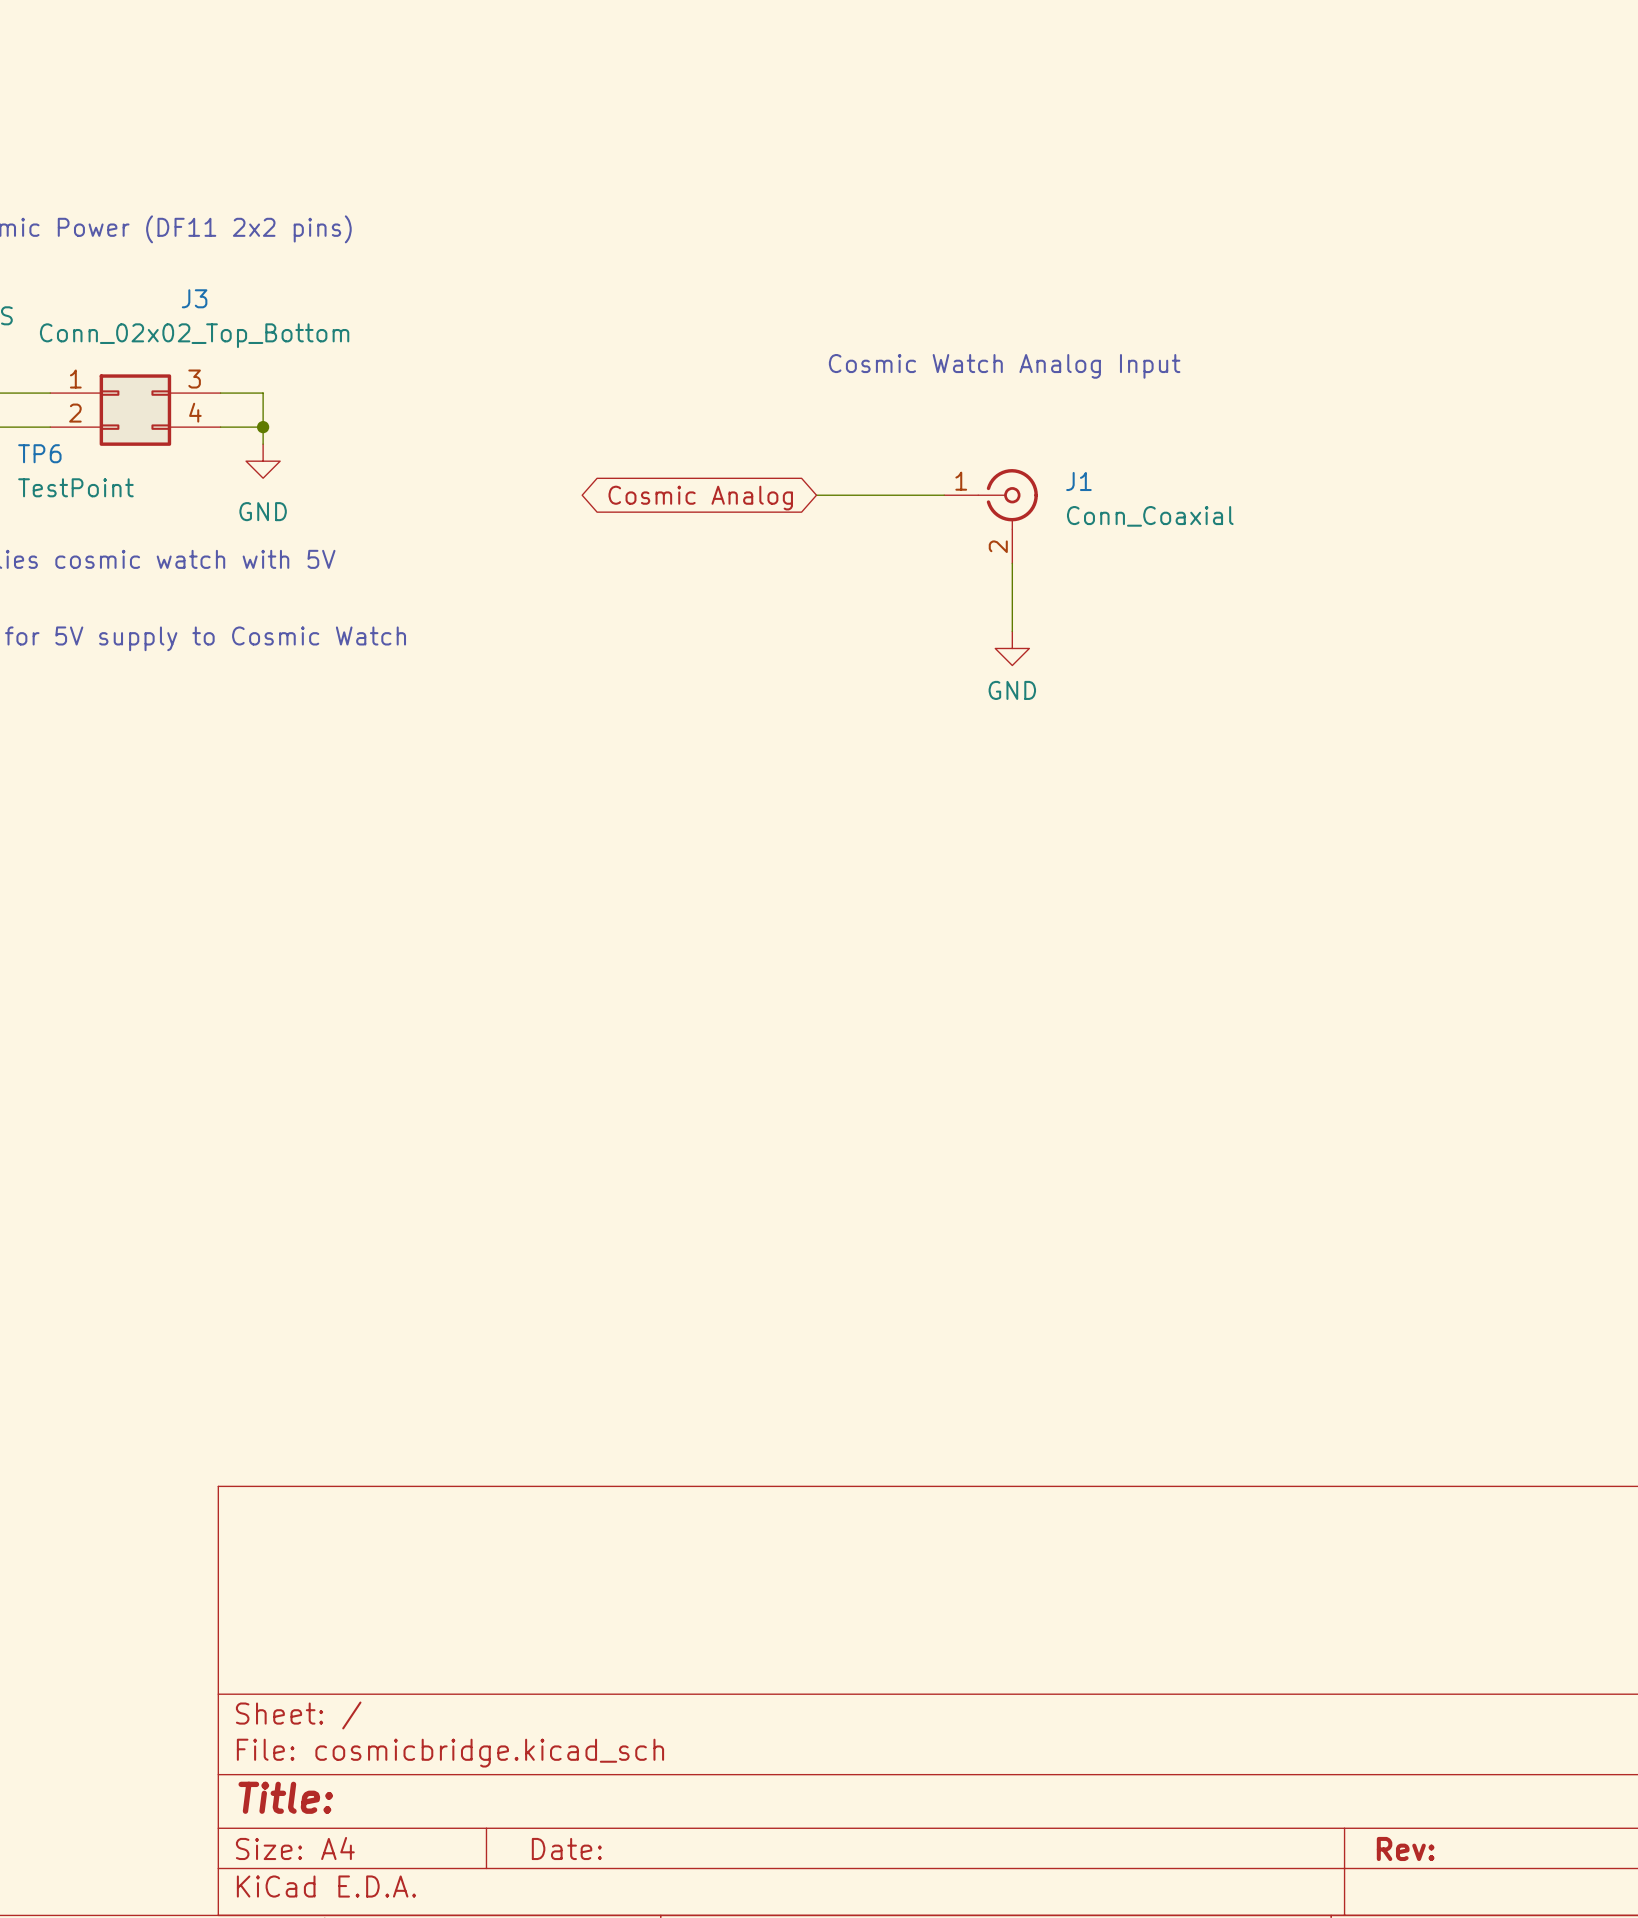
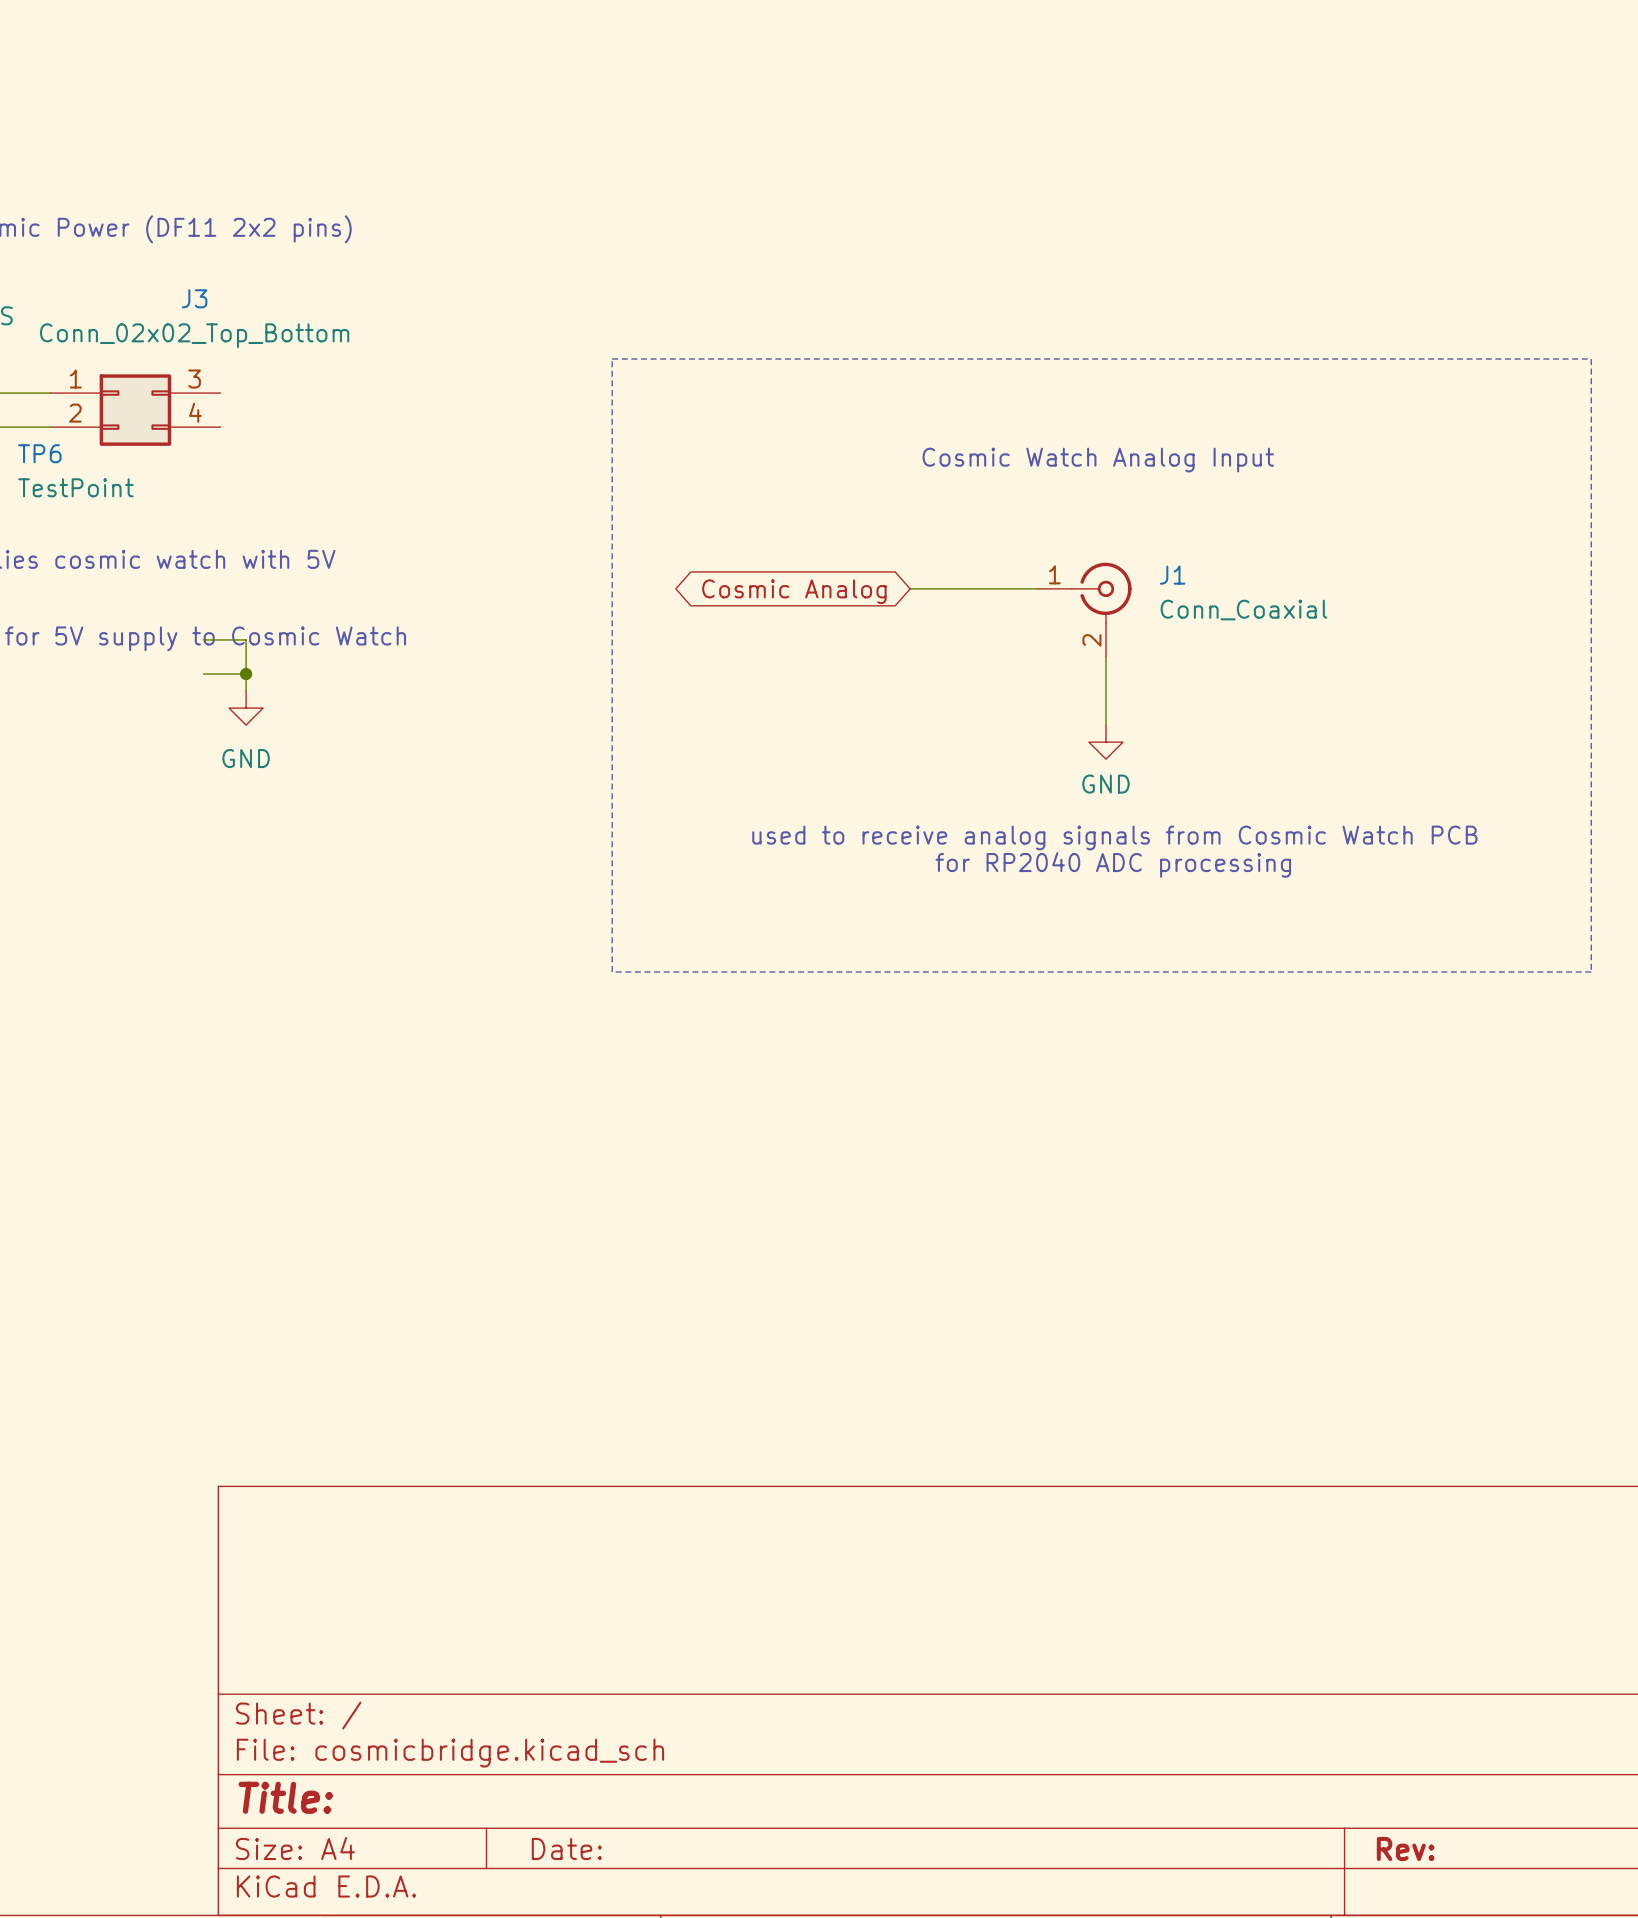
line: none -> (612, 359) (1591, 359) (1591, 972) (612, 972) (612, 359)
text position: Cosmic Watch Analog Input (1004, 366) -> Cosmic Watch Analog Input (1098, 460)
wire: (220, 393) (263, 393) (263, 444) -> (203, 639) (246, 639) (246, 691)
wire: (220, 427) (263, 427) -> (203, 674) (246, 674)
junction: (263, 427) -> none
power symbol position: GND (263, 461) -> GND (246, 708)
wire: (816, 495) (944, 495) -> (910, 588) (1037, 588)
global label position: Cosmic Analog (700, 498) -> Cosmic Analog (794, 591)
J1 position: (991, 516) -> (1084, 609)
wire: (1012, 563) (1012, 631) -> (1105, 656) (1105, 725)
power symbol position: GND (1012, 648) -> GND (1105, 742)
junction: none -> (246, 674)
text: none -> used to receive analog signals from Cosmic Watch PCB (1114, 837)
text: none -> for RP2040 ADC processing (1113, 864)

